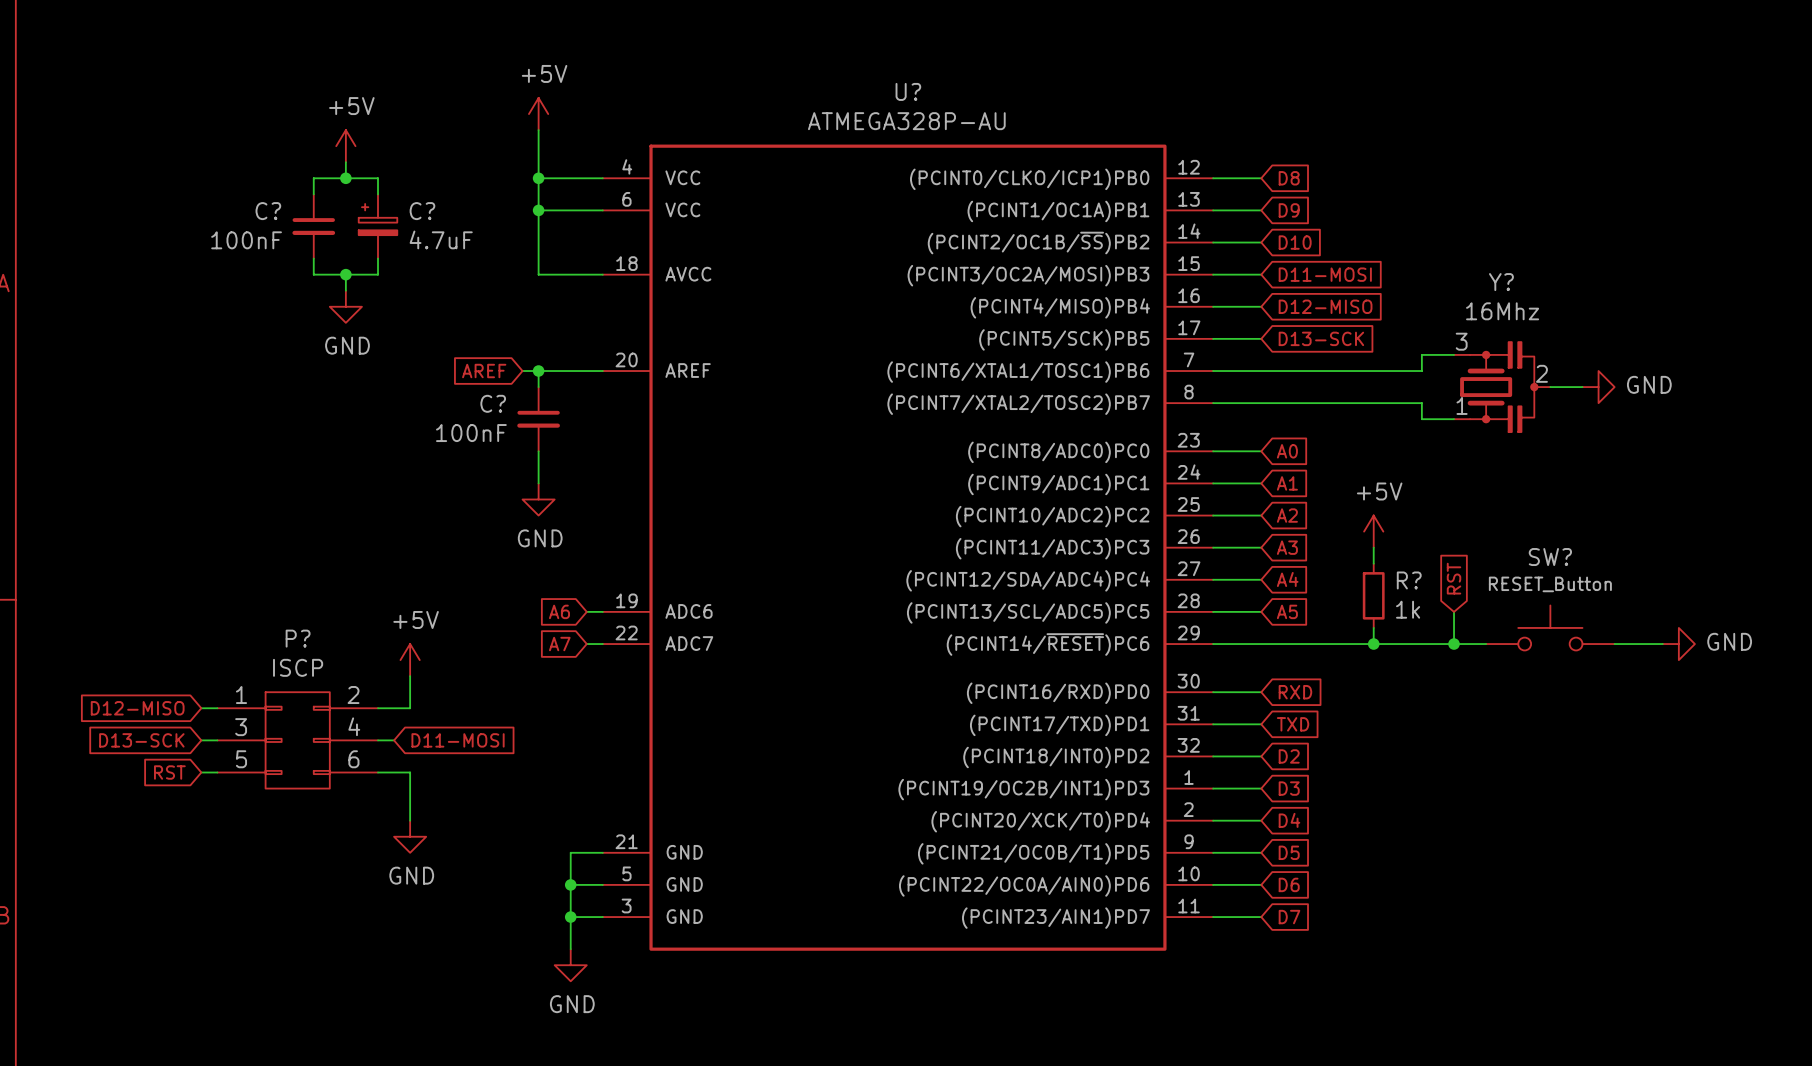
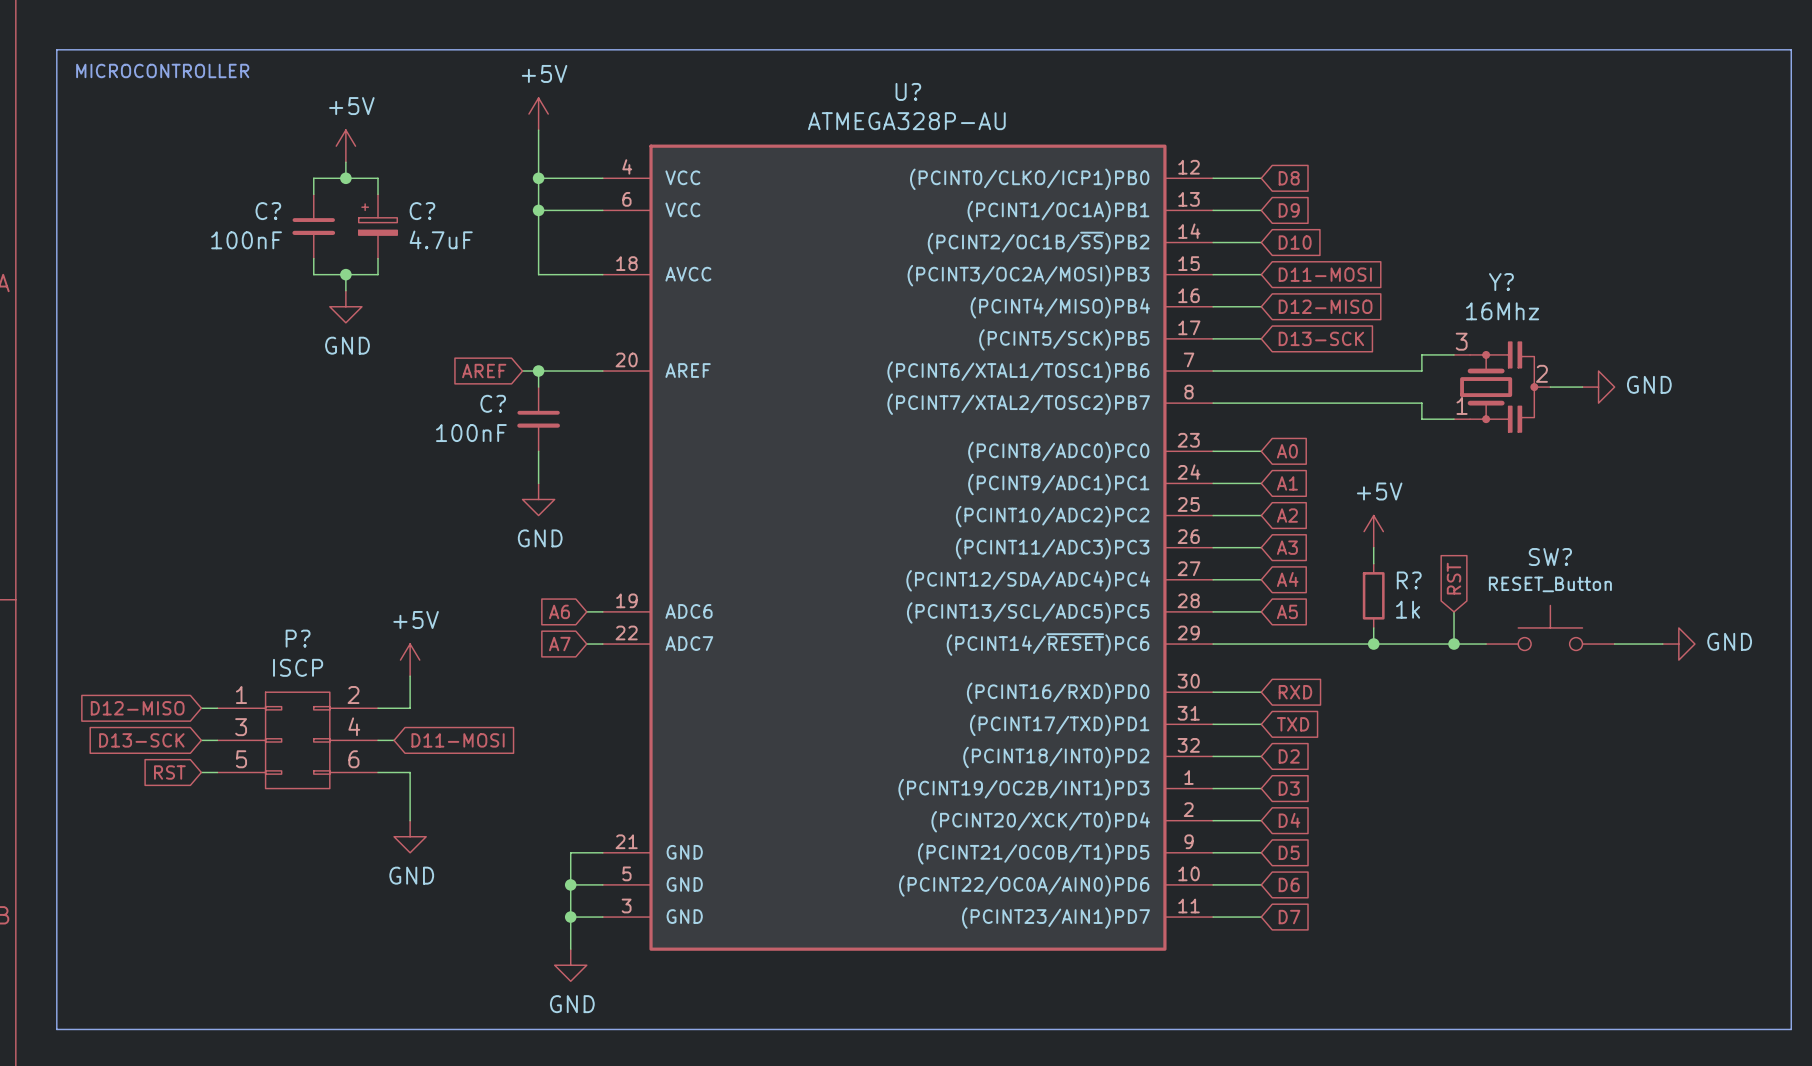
bus: none -> (56, 49) (56, 1029) (1791, 1029) (1791, 49) (56, 49)
text: none -> MICROCONTROLLER (162, 70)

